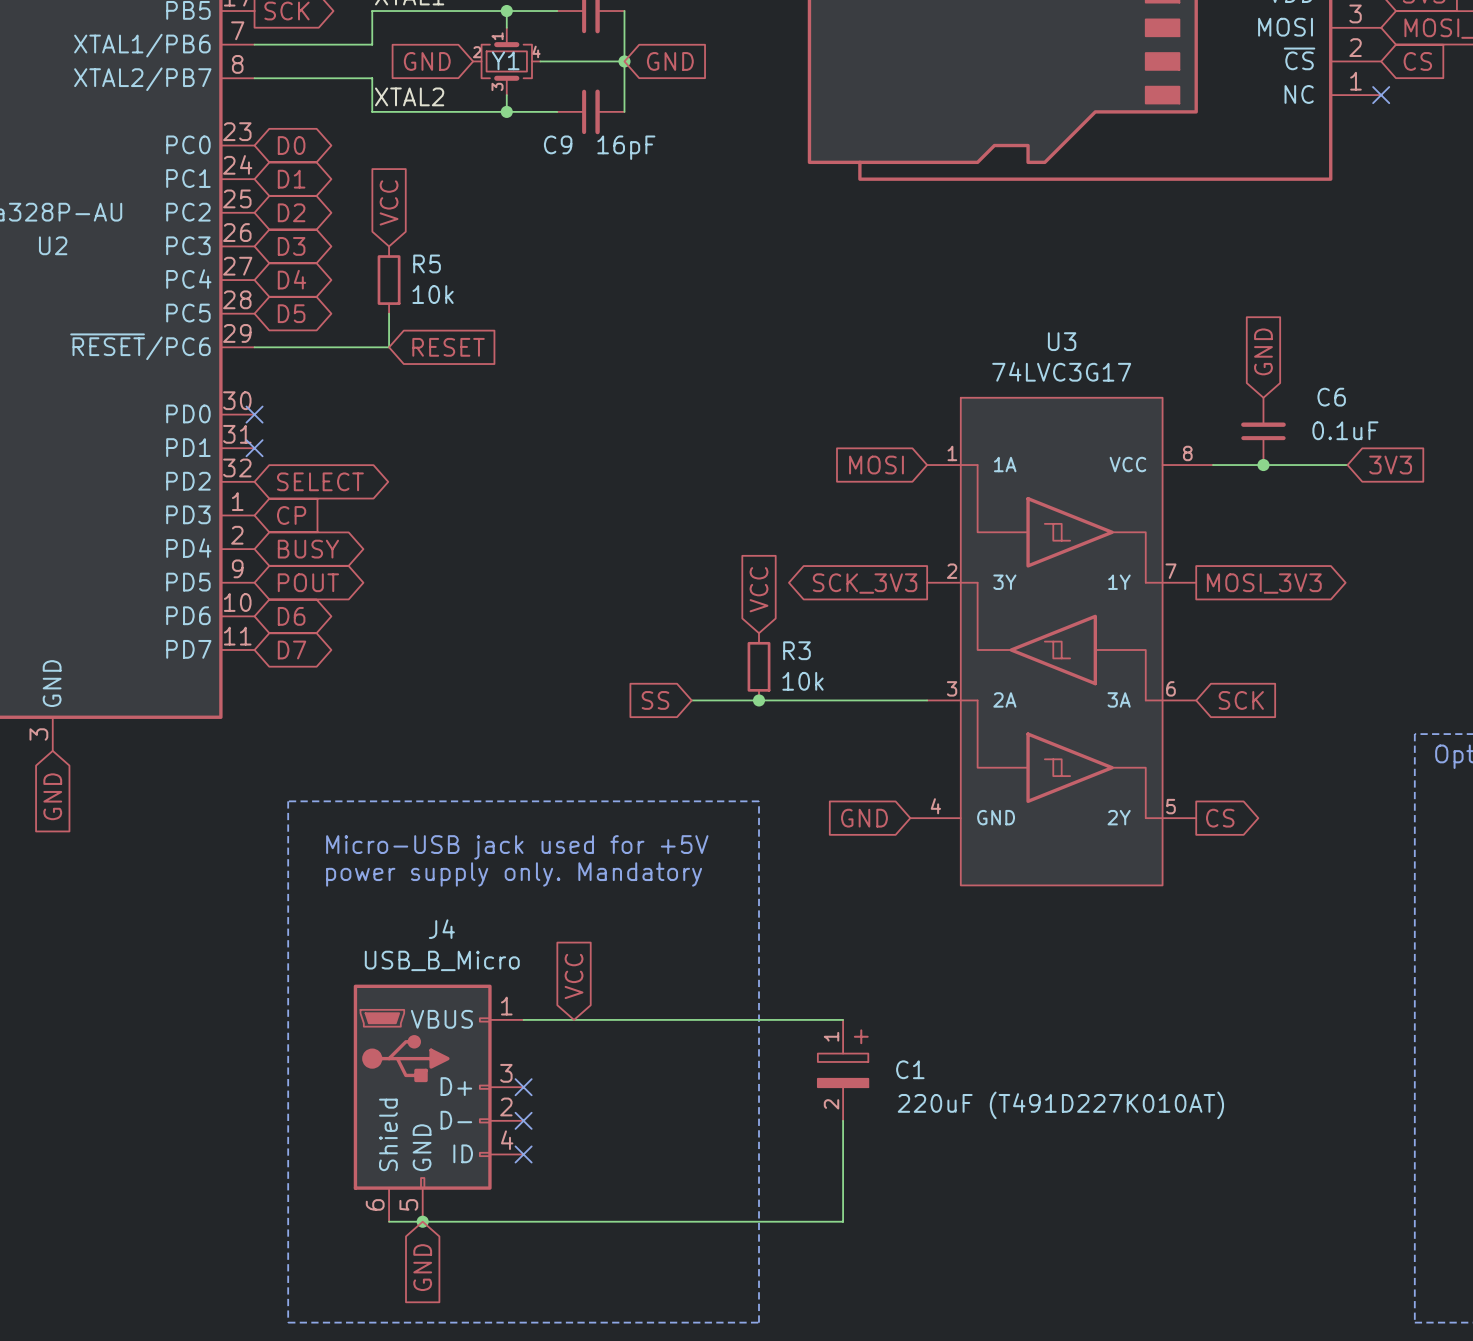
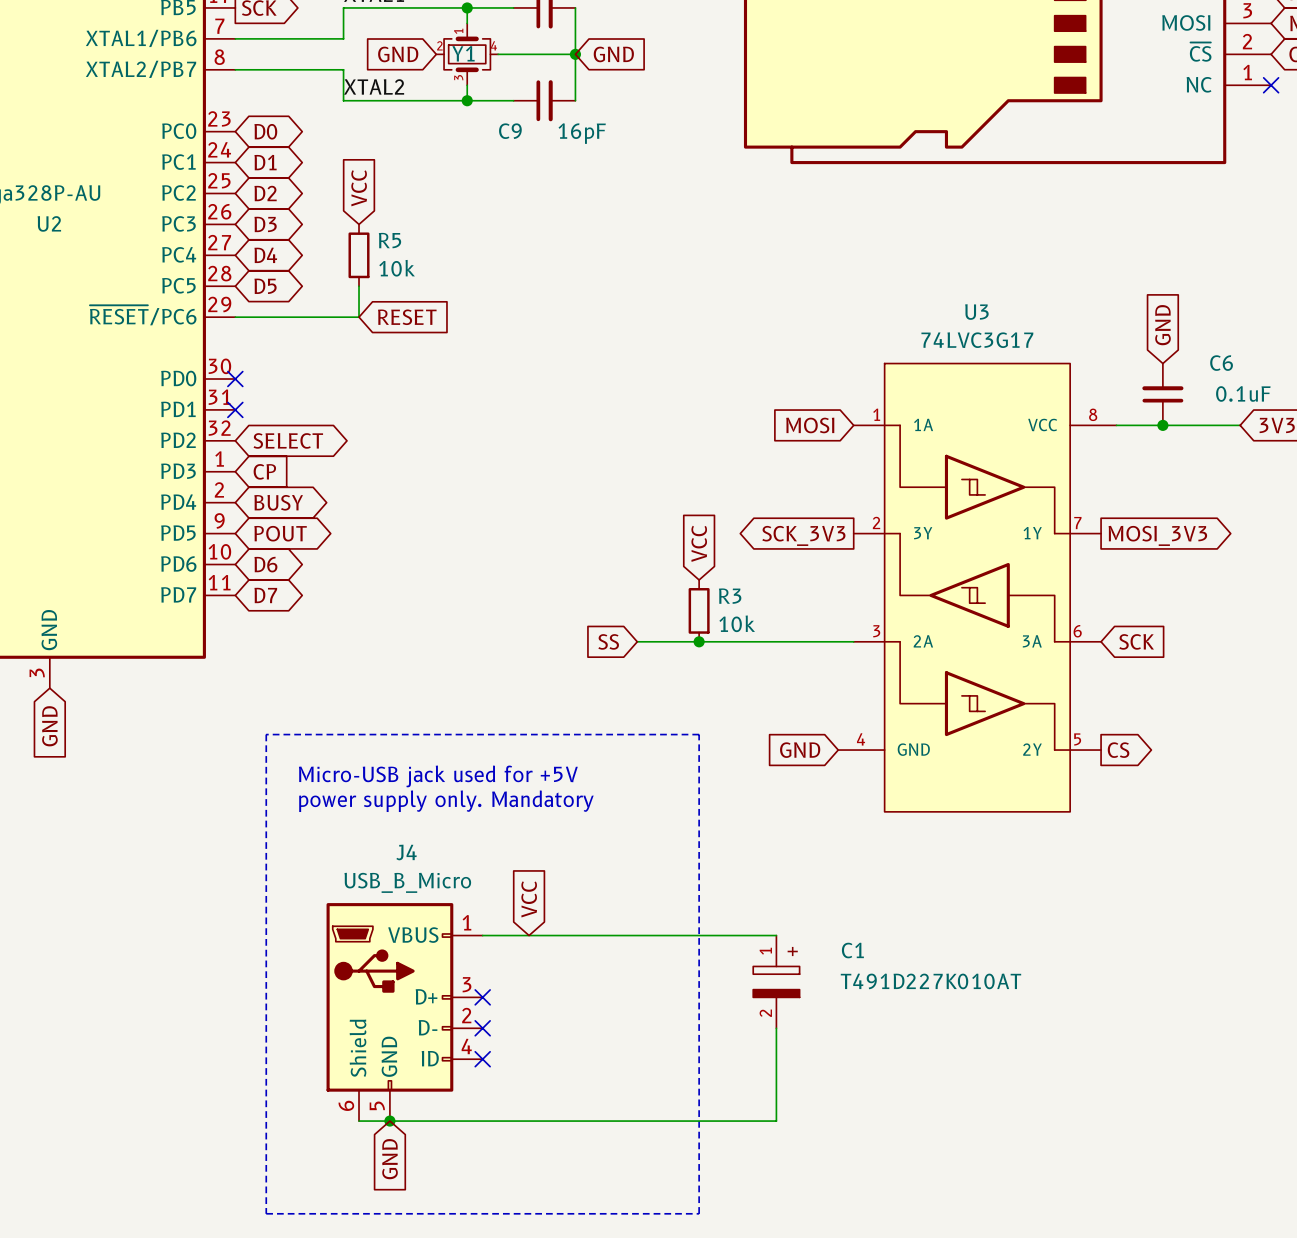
C1 name position: C1 (910, 1069) -> C1 (852, 950)
C1 value: 220uF (T491D227K010AT) (1060, 1105) -> T491D227K010AT (930, 981)

